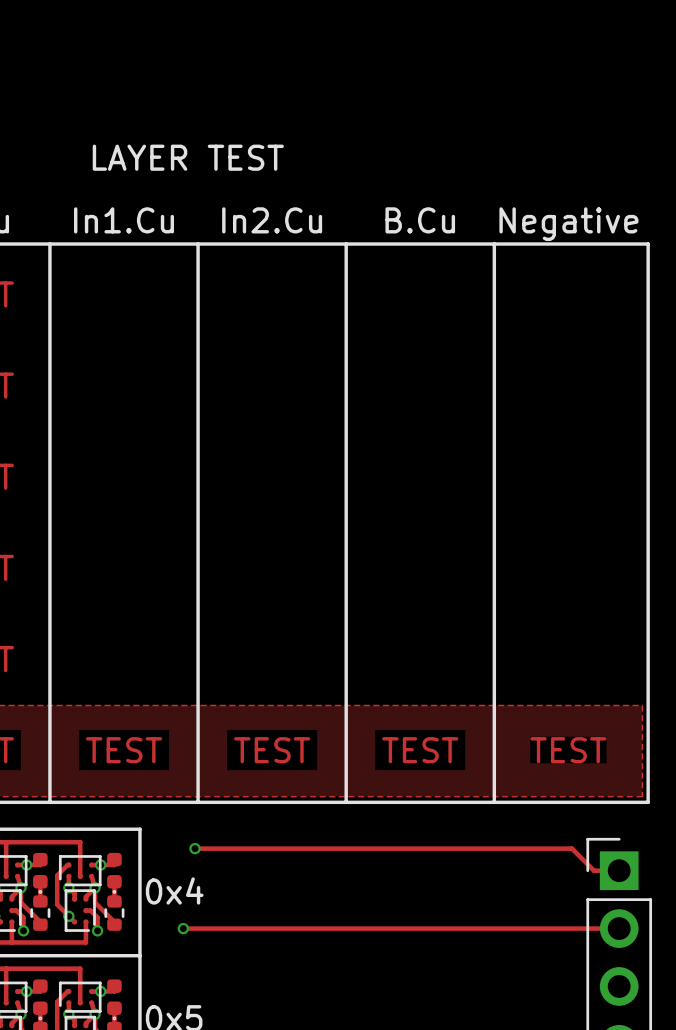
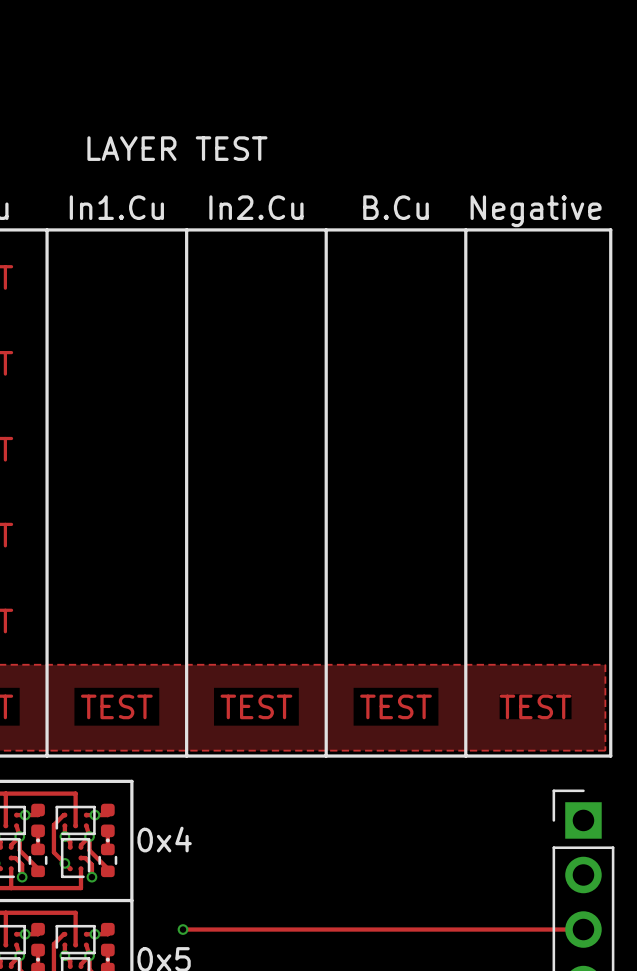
track: (195, 848) (571, 848) (594, 870) (619, 870) -> none
via: (195, 848) -> none
track: (183, 928) (619, 928) -> none
via position: (183, 928) -> (183, 929)
track: none -> (183, 929) (583, 929)

